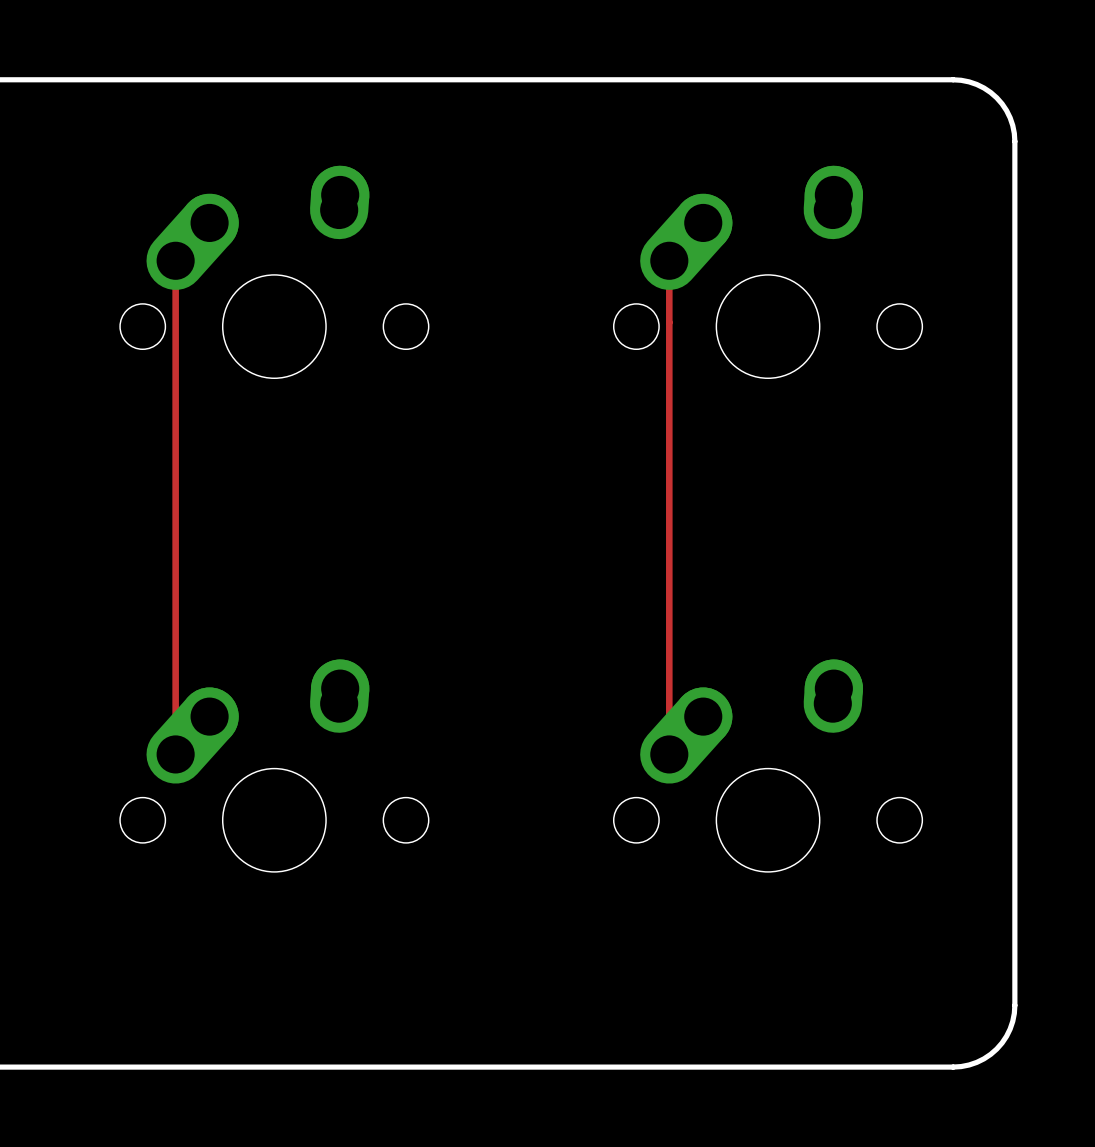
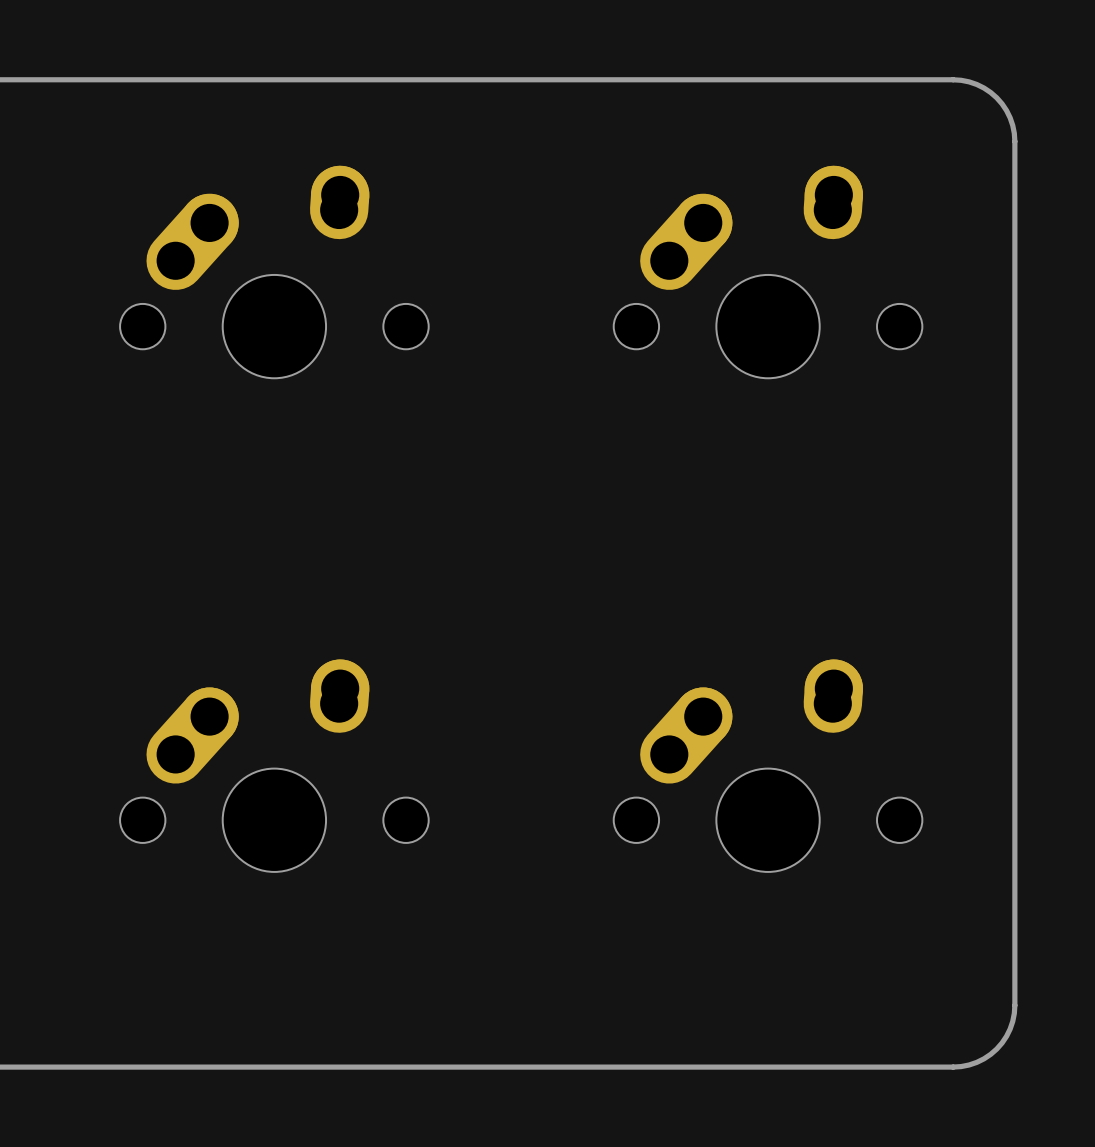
track: (175, 260) (175, 754) -> none
track: (669, 260) (669, 754) -> none

